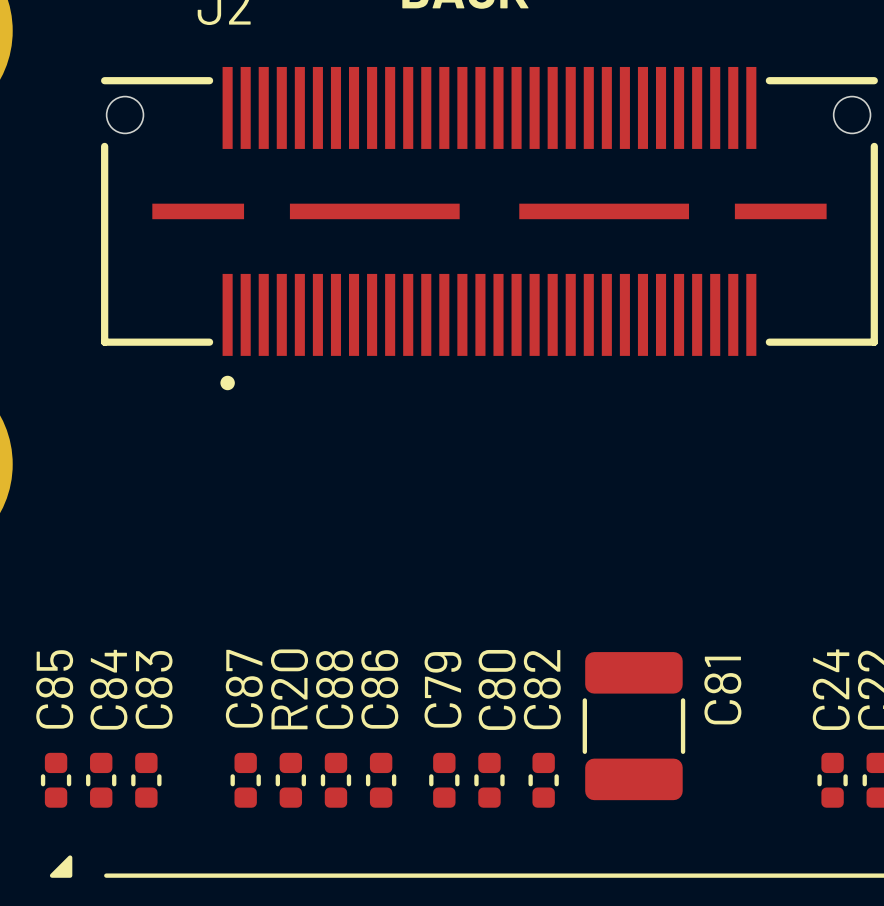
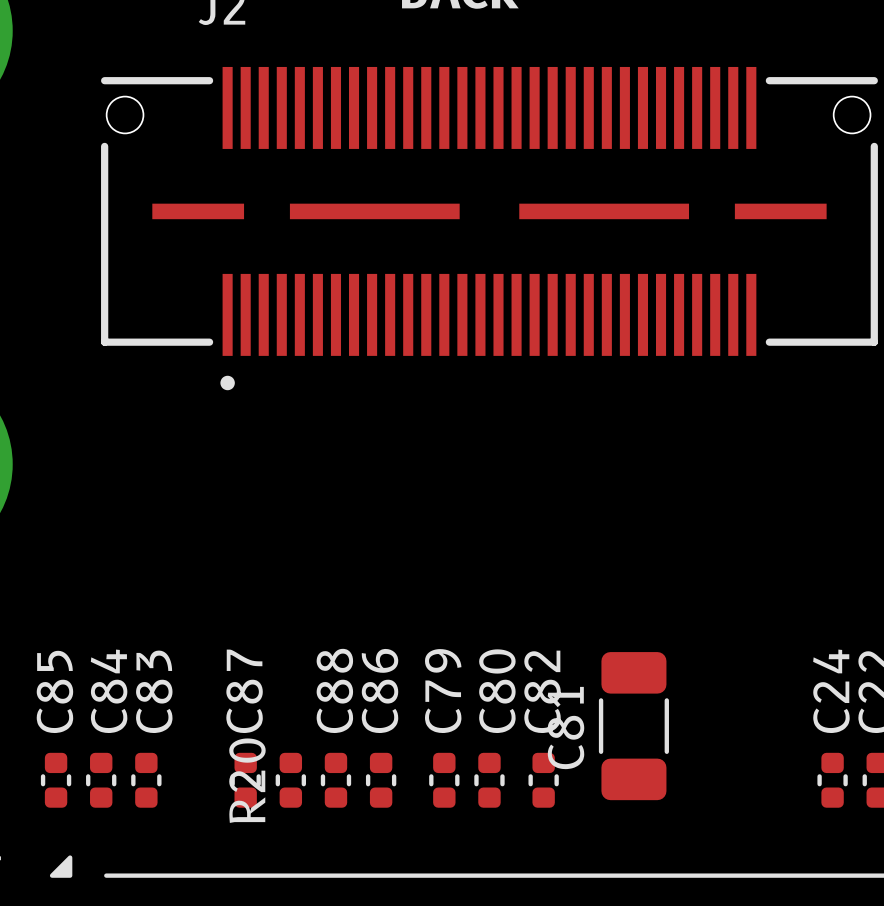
C81 footprint: [582, 652, 686, 801] -> [598, 652, 669, 801]
R20 name position: R20 (289, 689) -> R20 (247, 780)
C81 name position: C81 (722, 690) -> C81 (565, 728)

